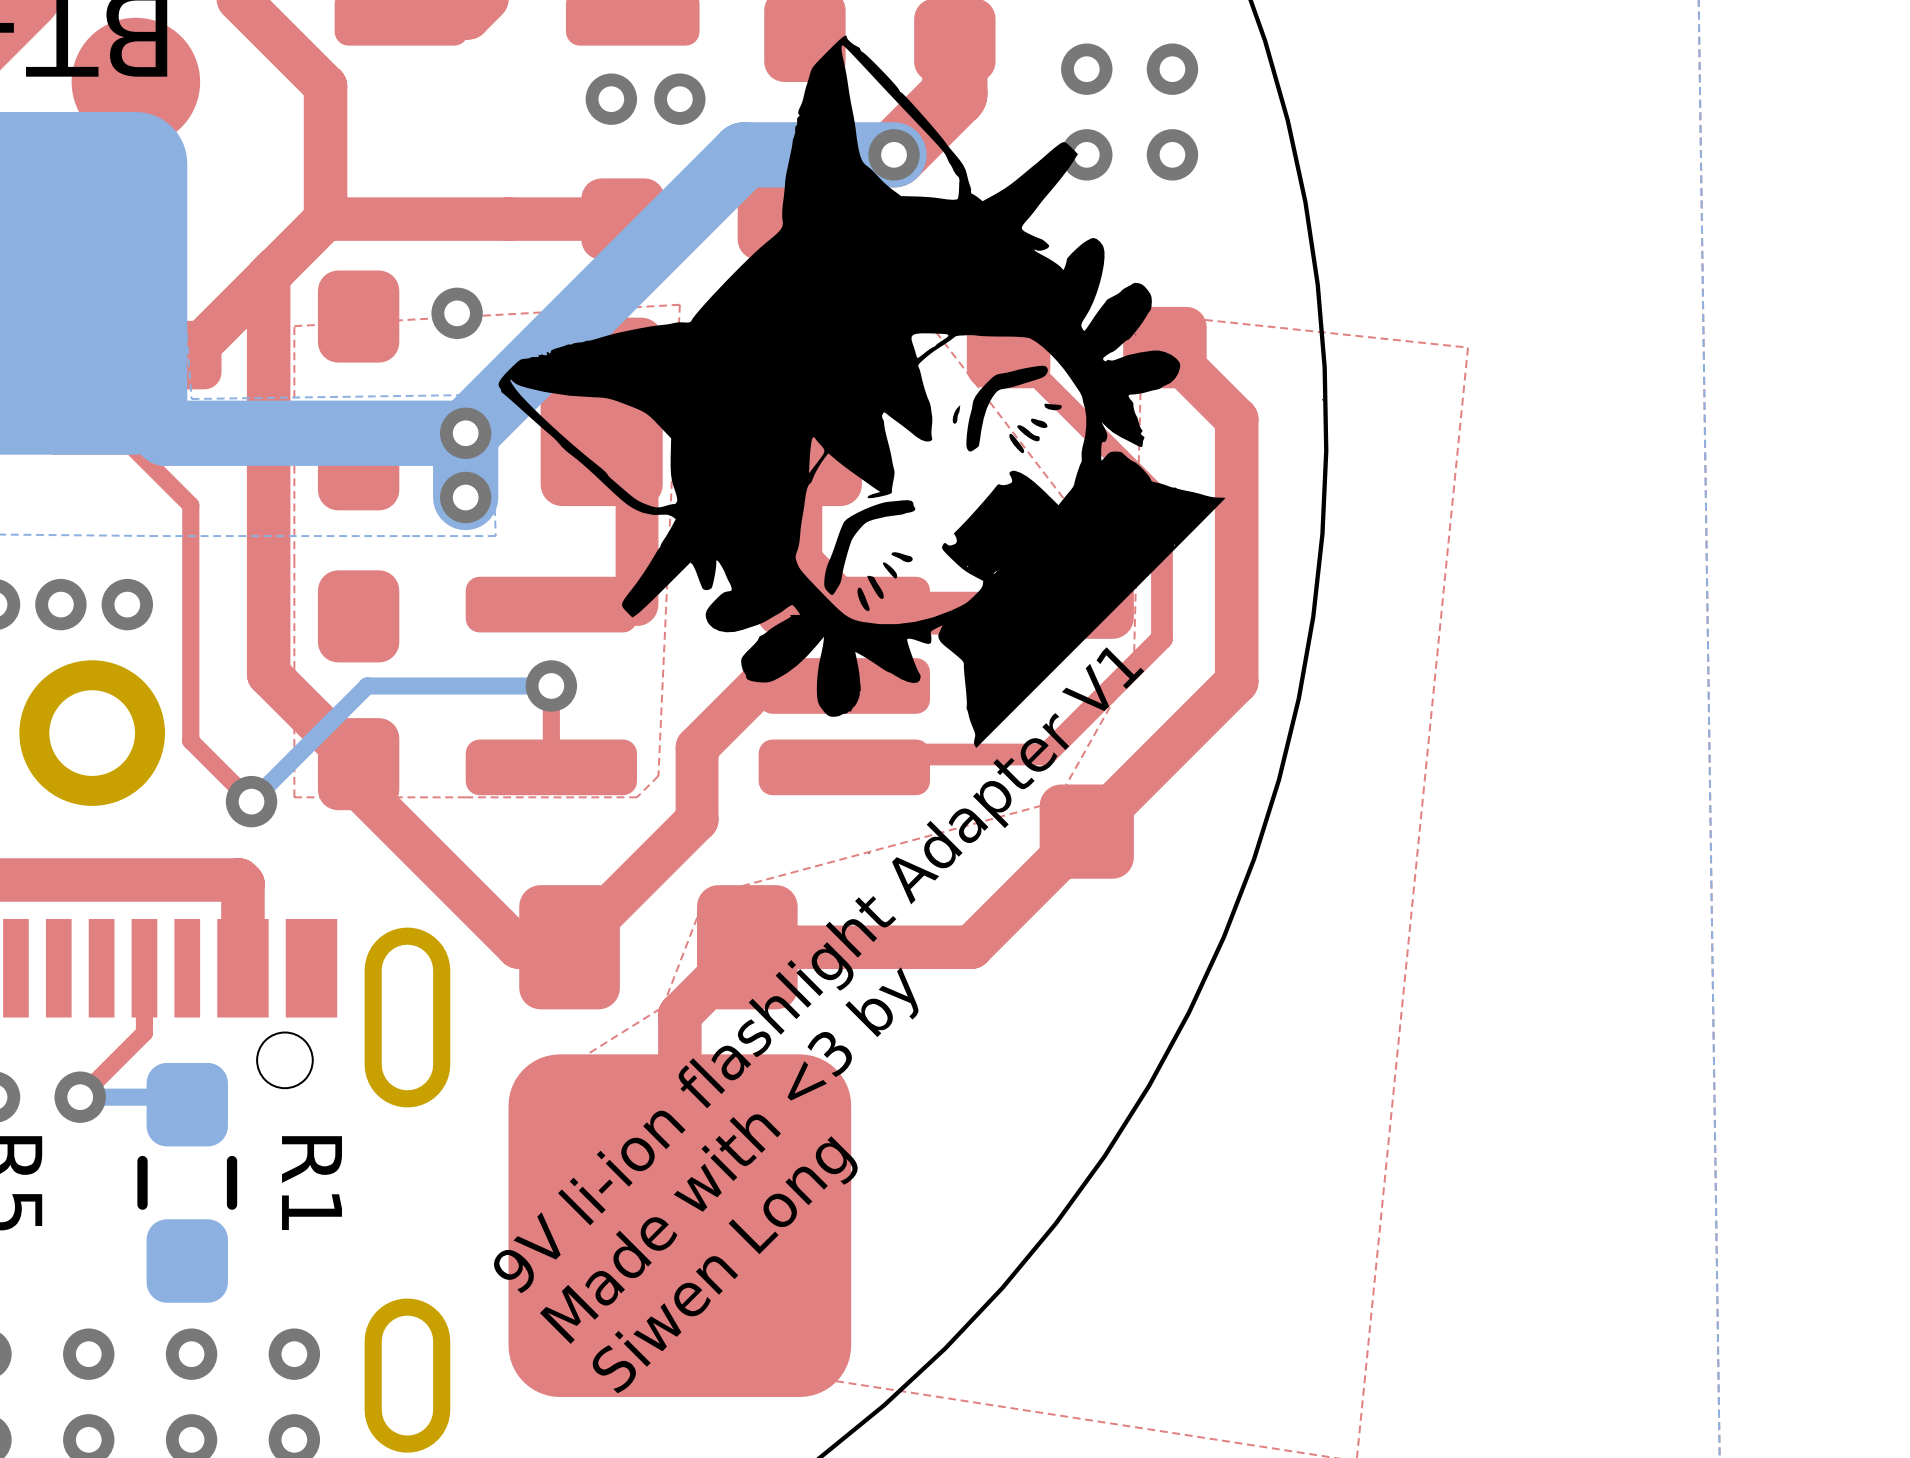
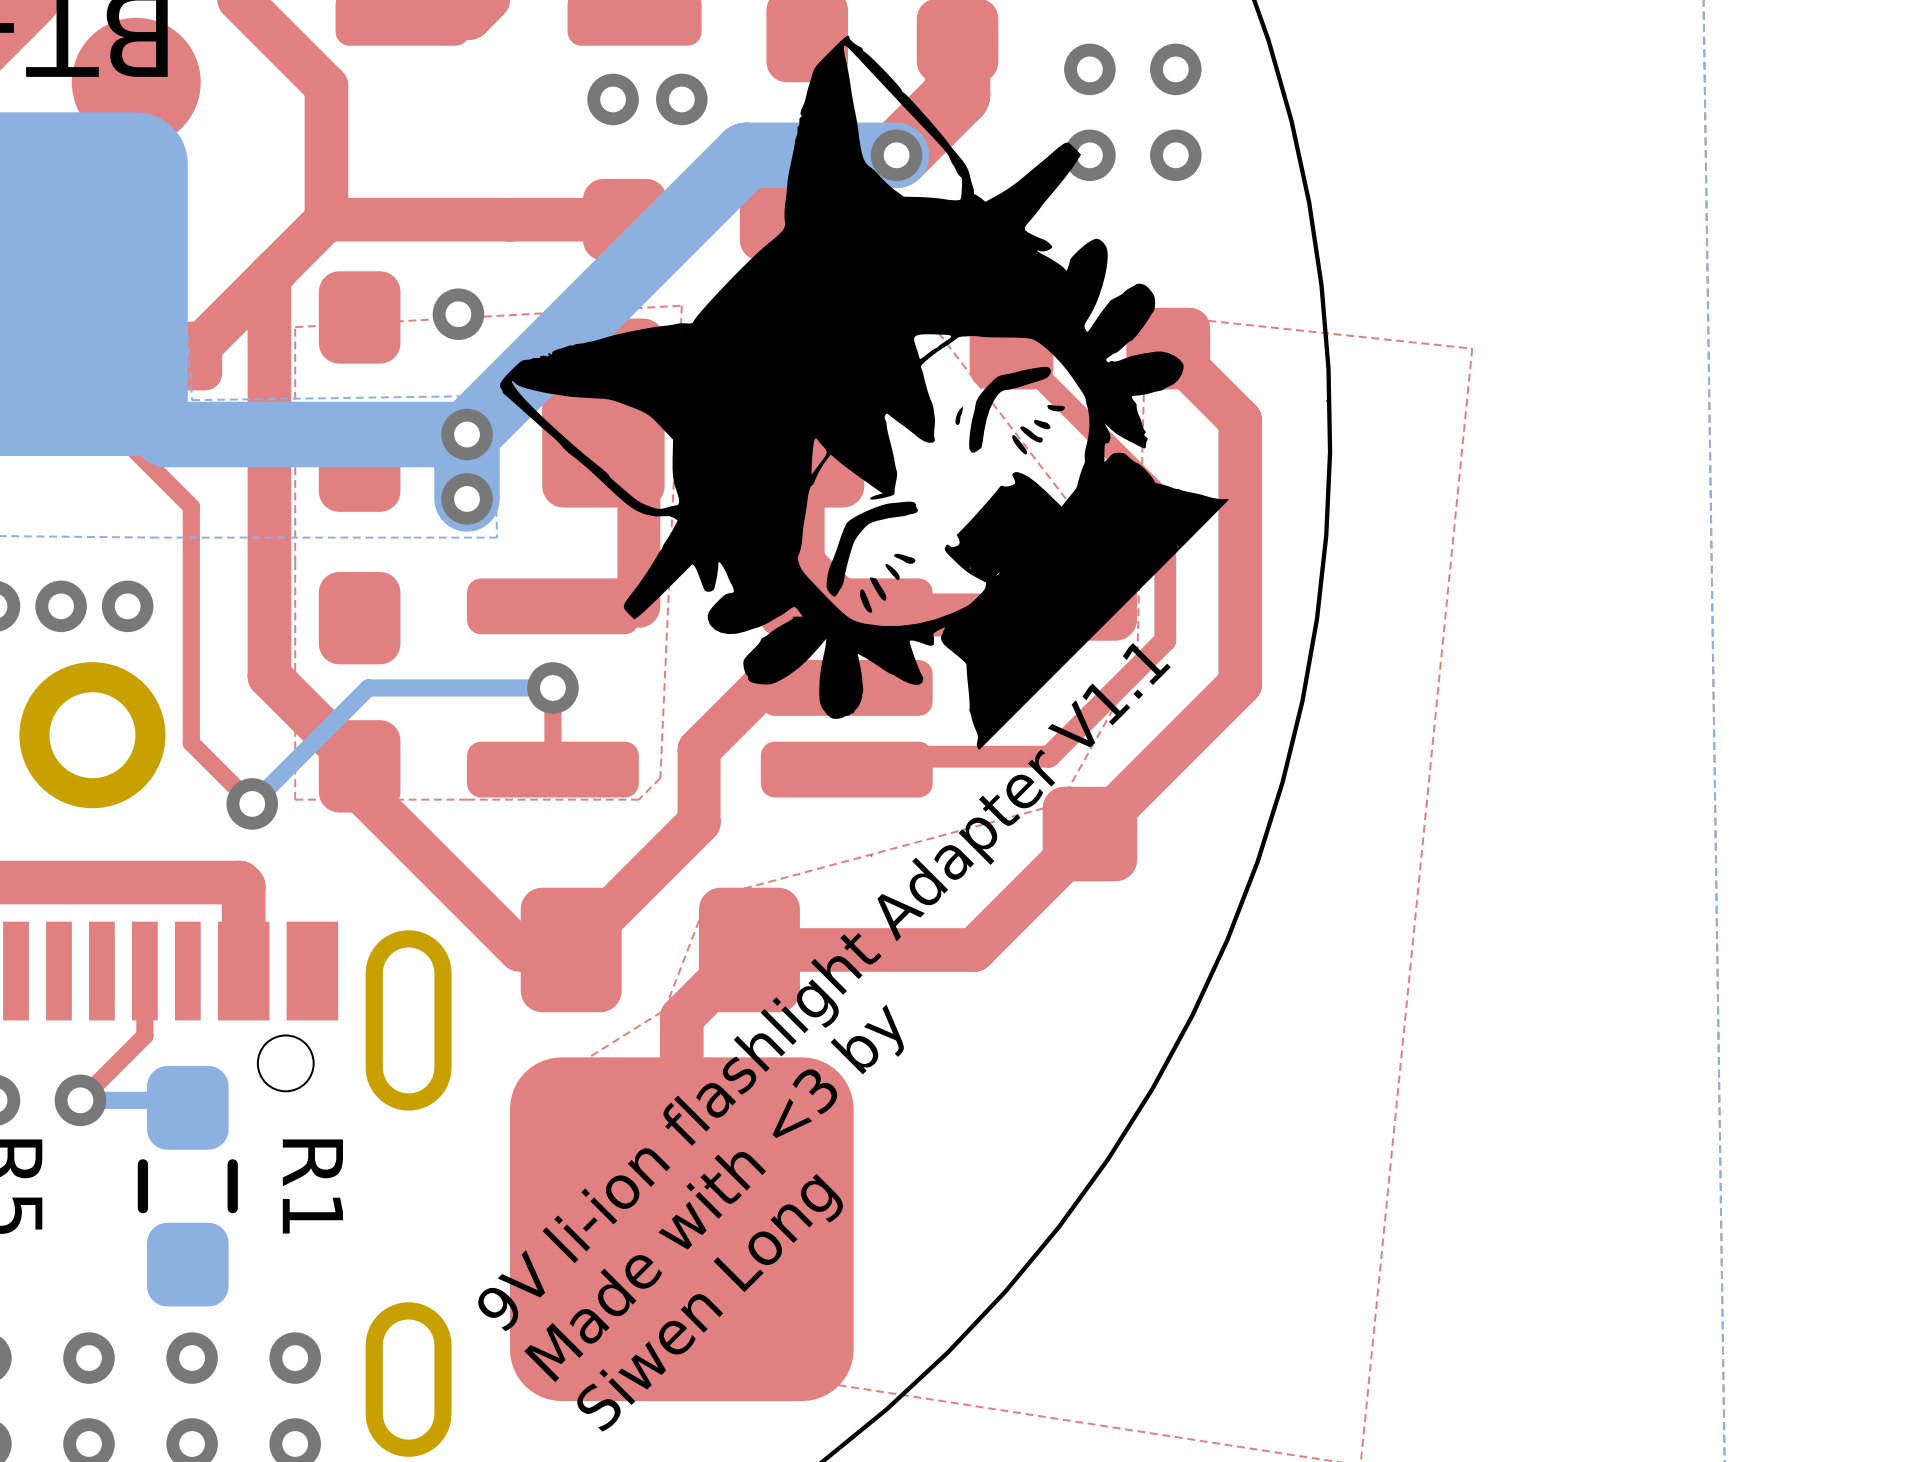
text: 9V li-ion flashlight Adapter V1 (819, 970) -> 9V li-ion flashlight Adapter V1.1 (824, 987)
text position: Made with <3 by (729, 1155) -> Made with <3 by (714, 1193)
text position: Siwen Long (725, 1264) -> Siwen Long (709, 1302)

